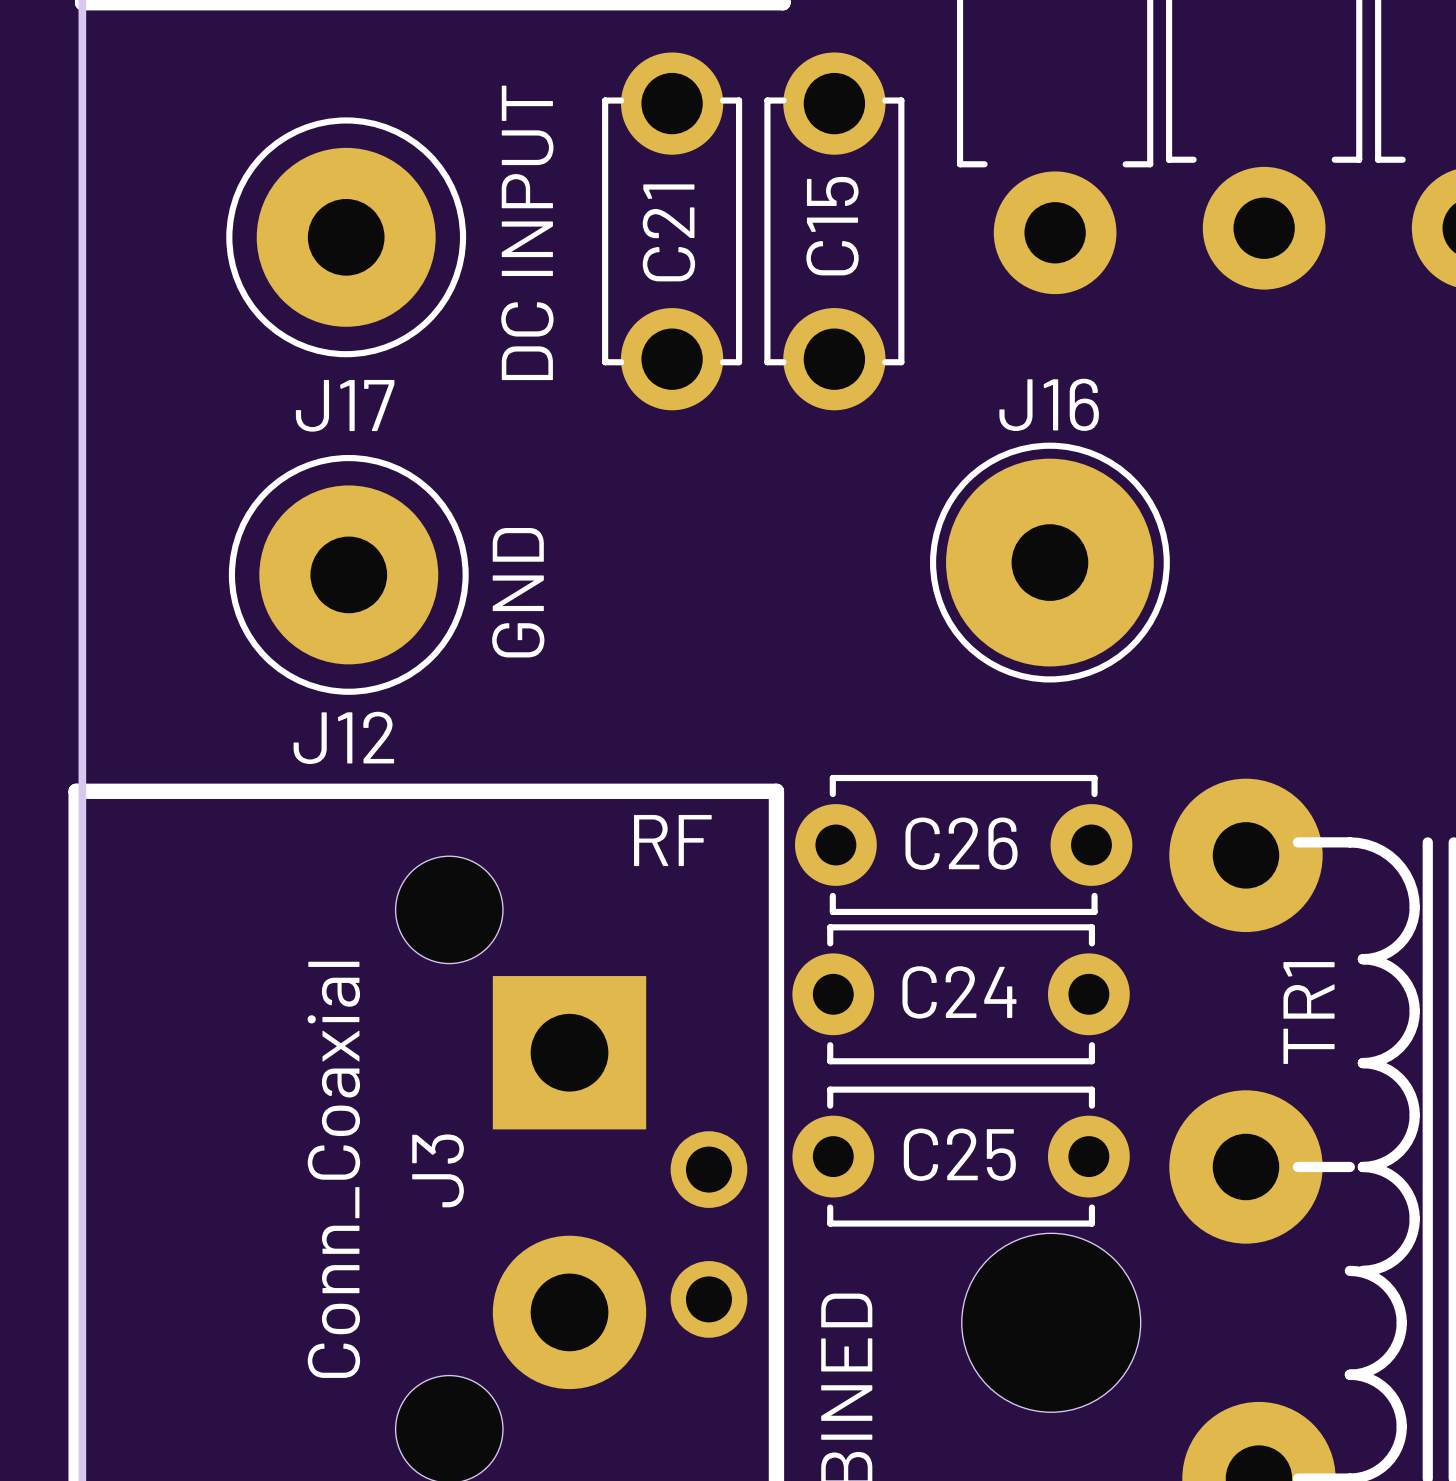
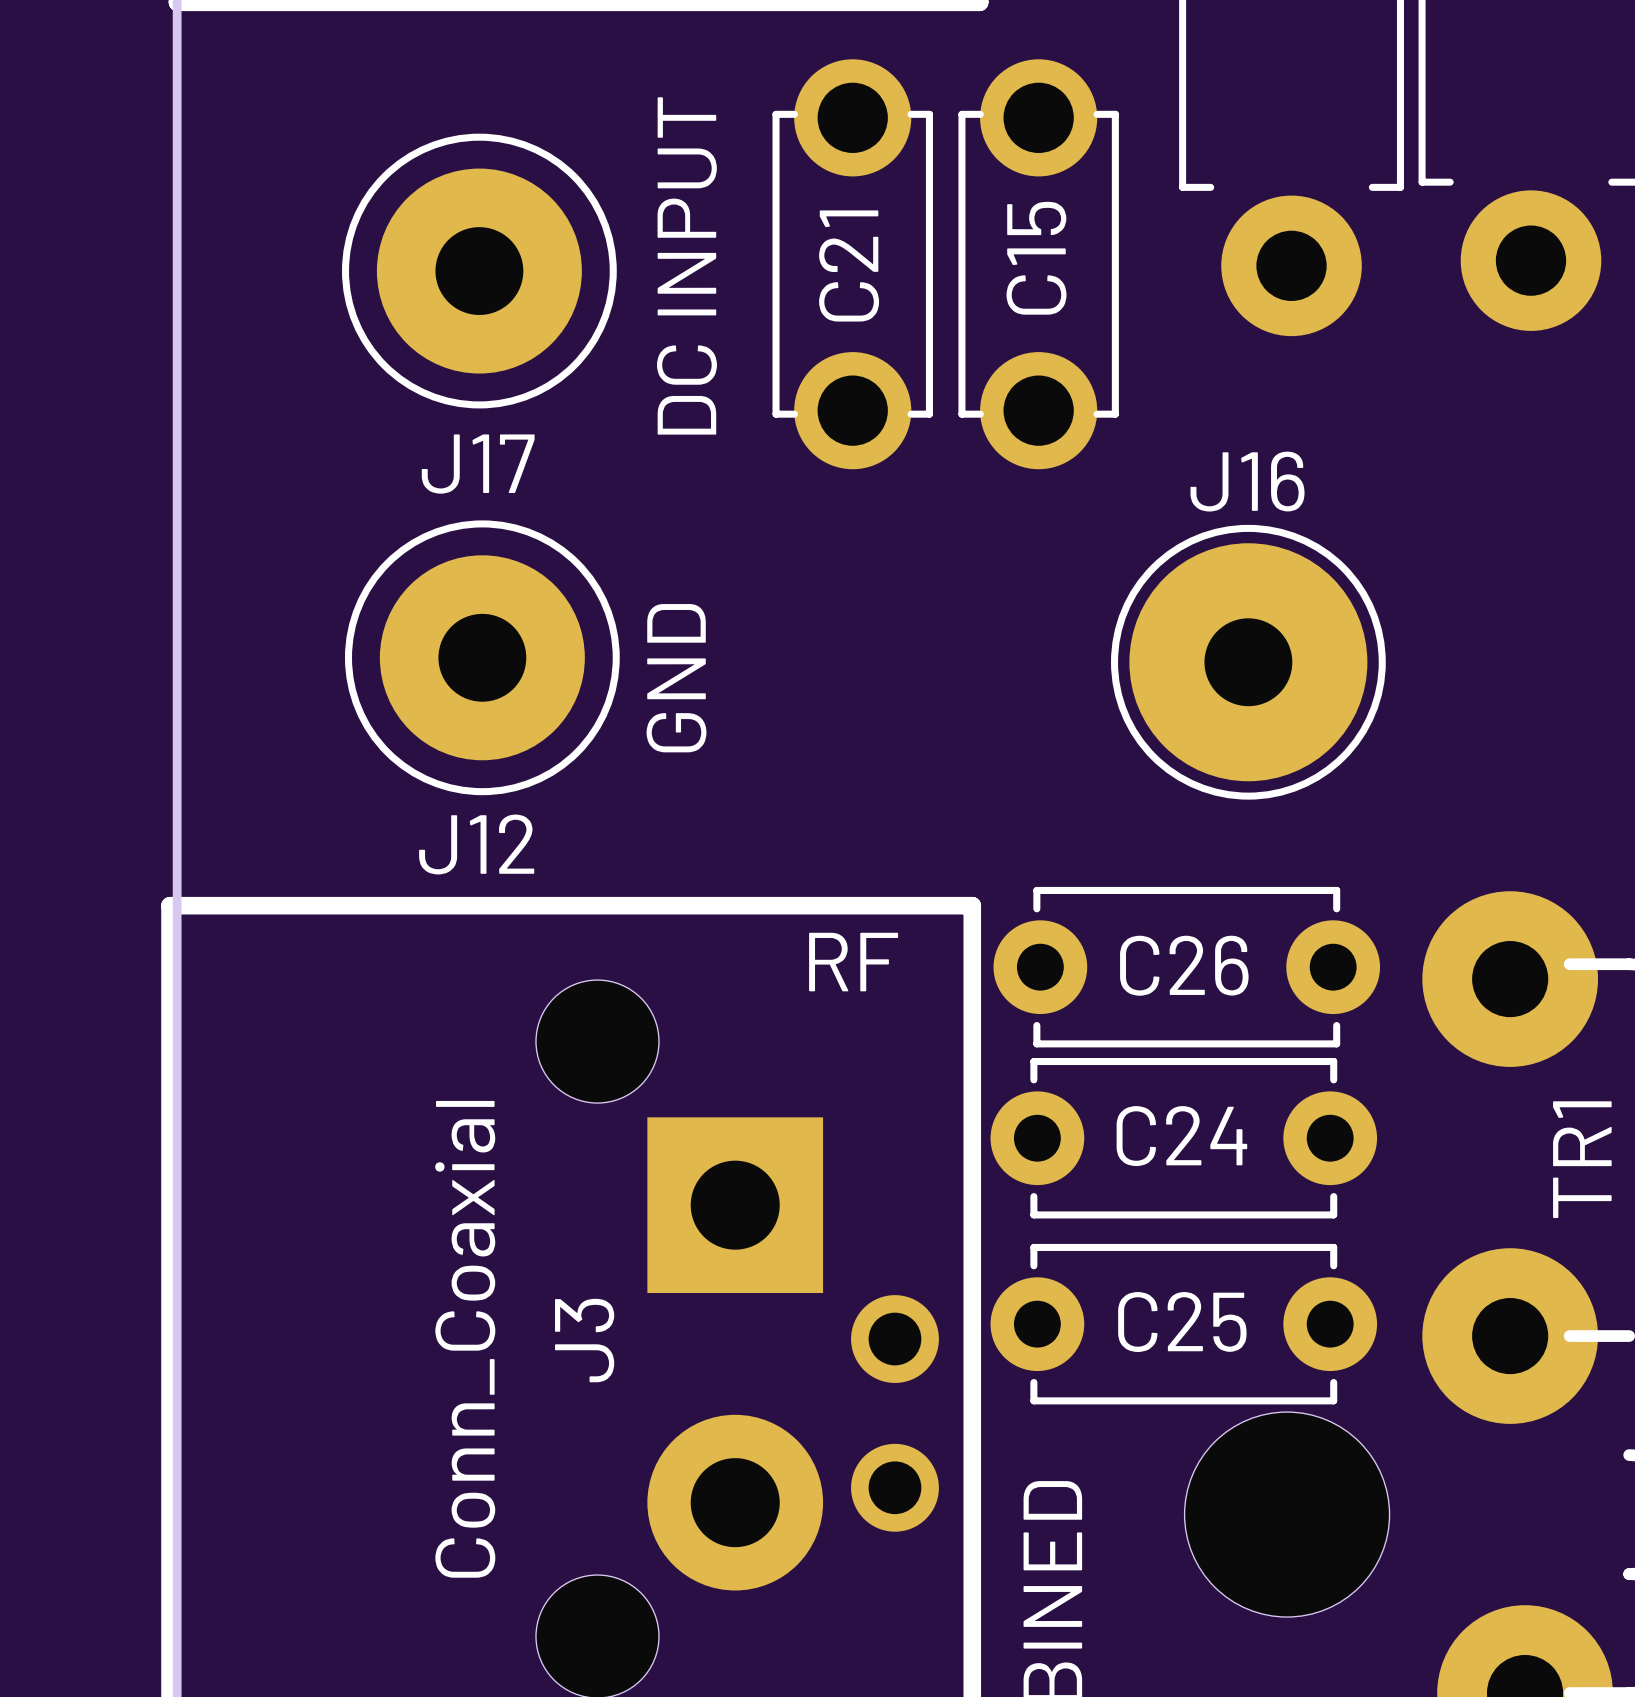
J16 position: (1049, 562) -> (1248, 662)

